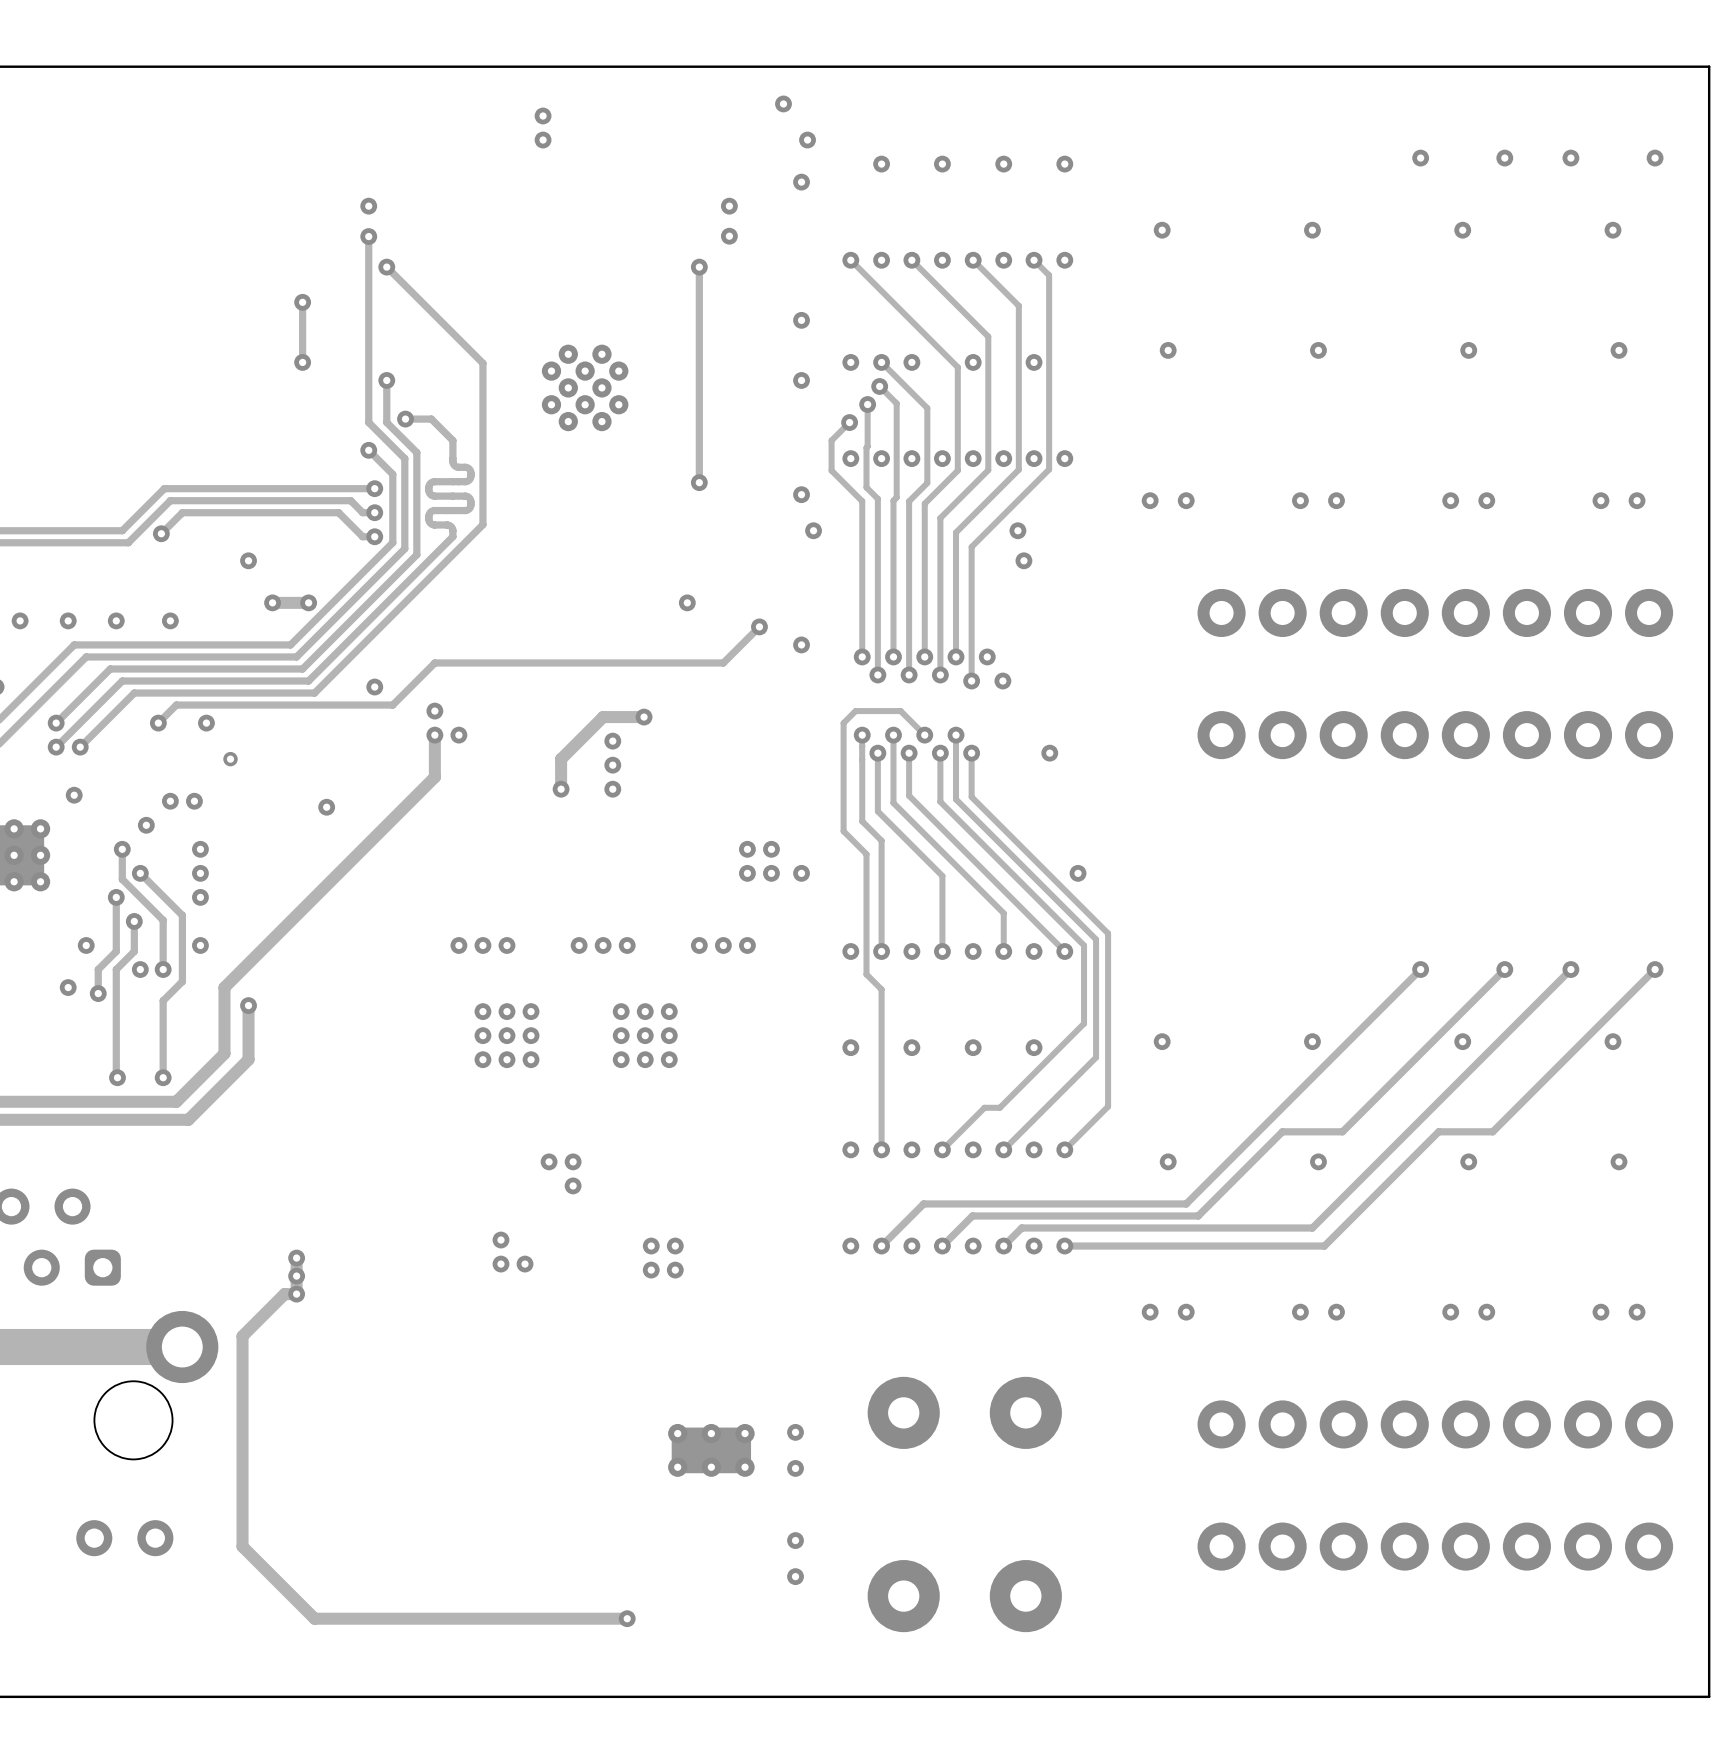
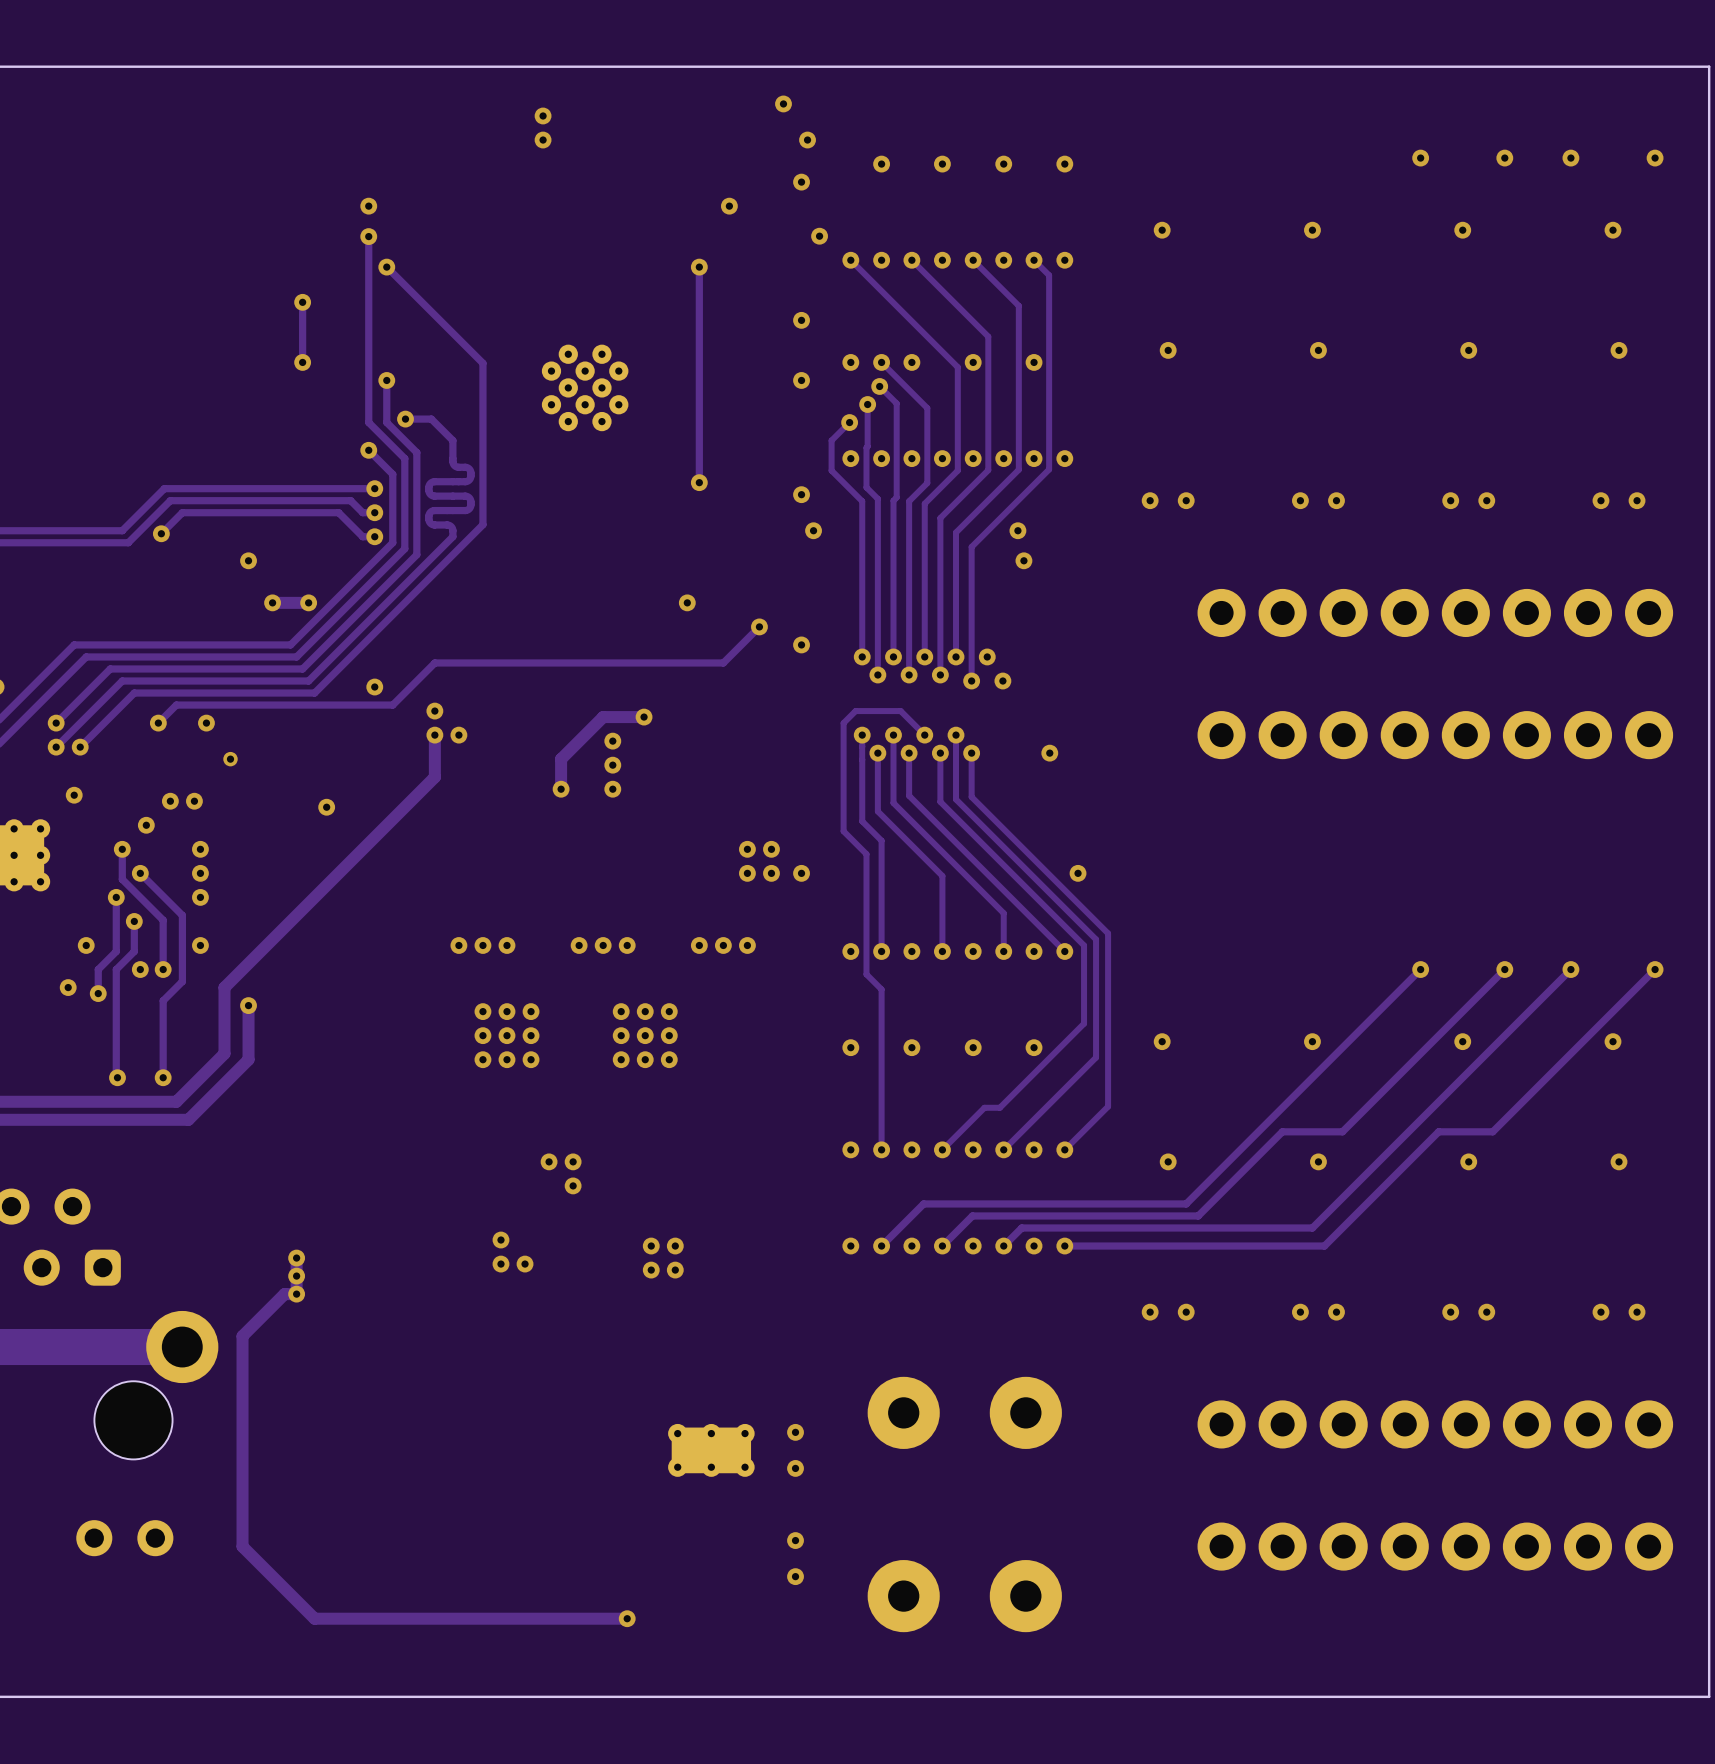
via position: (729, 236) -> (819, 236)
via: (20, 620) -> none
via: (68, 620) -> none
via: (116, 620) -> none
via: (170, 620) -> none

